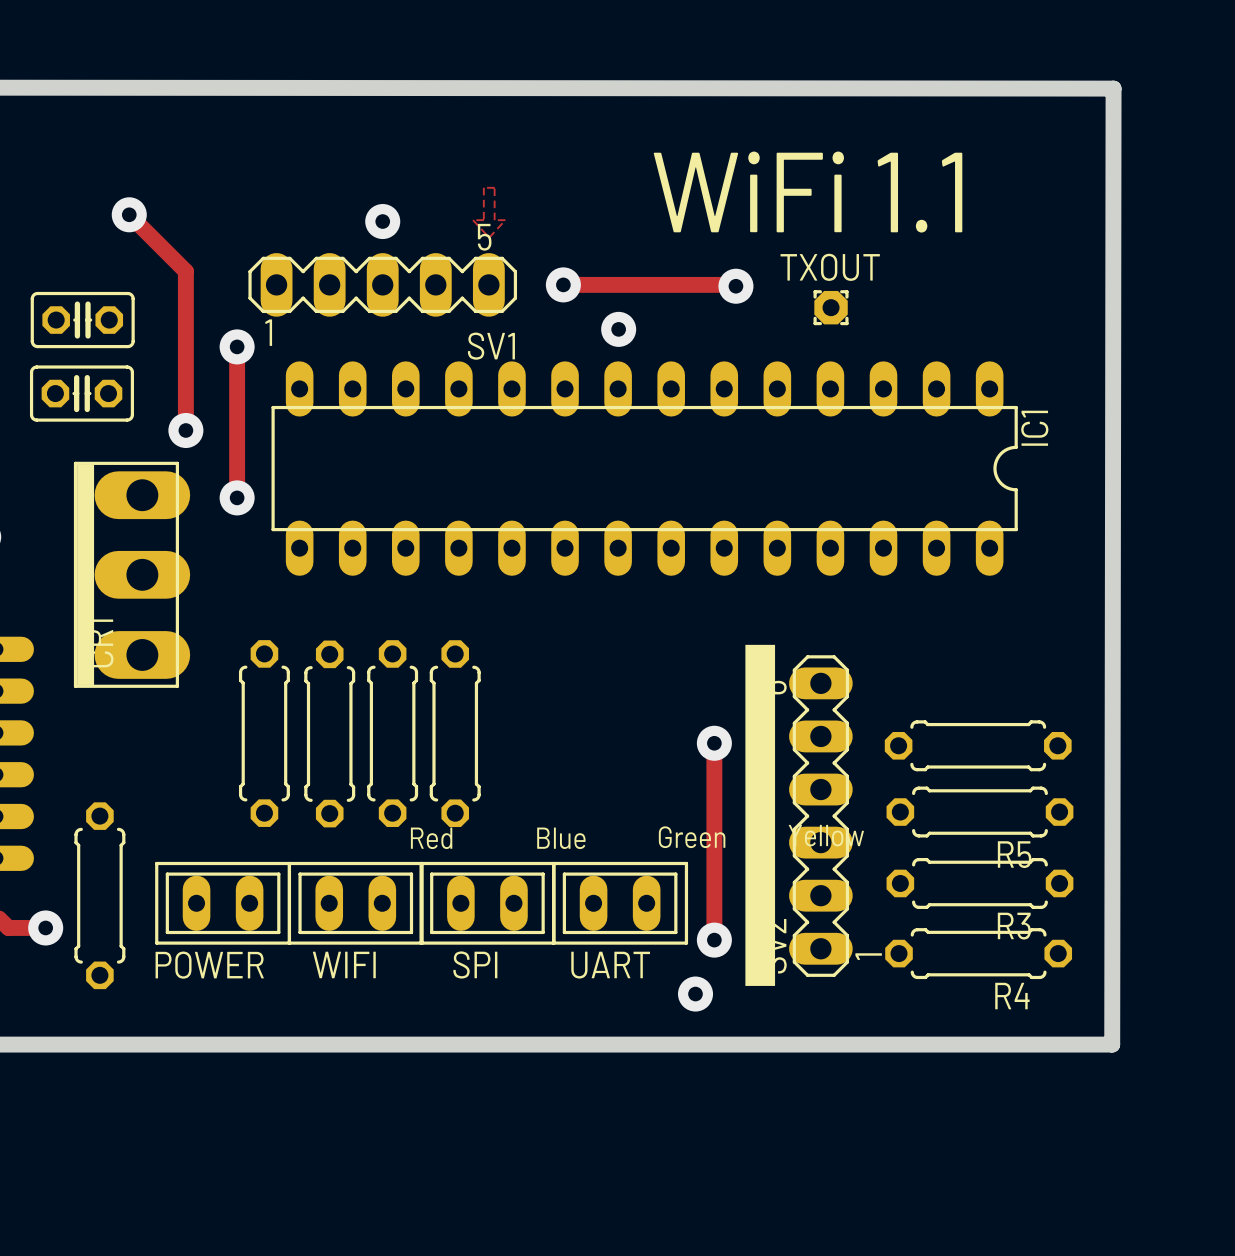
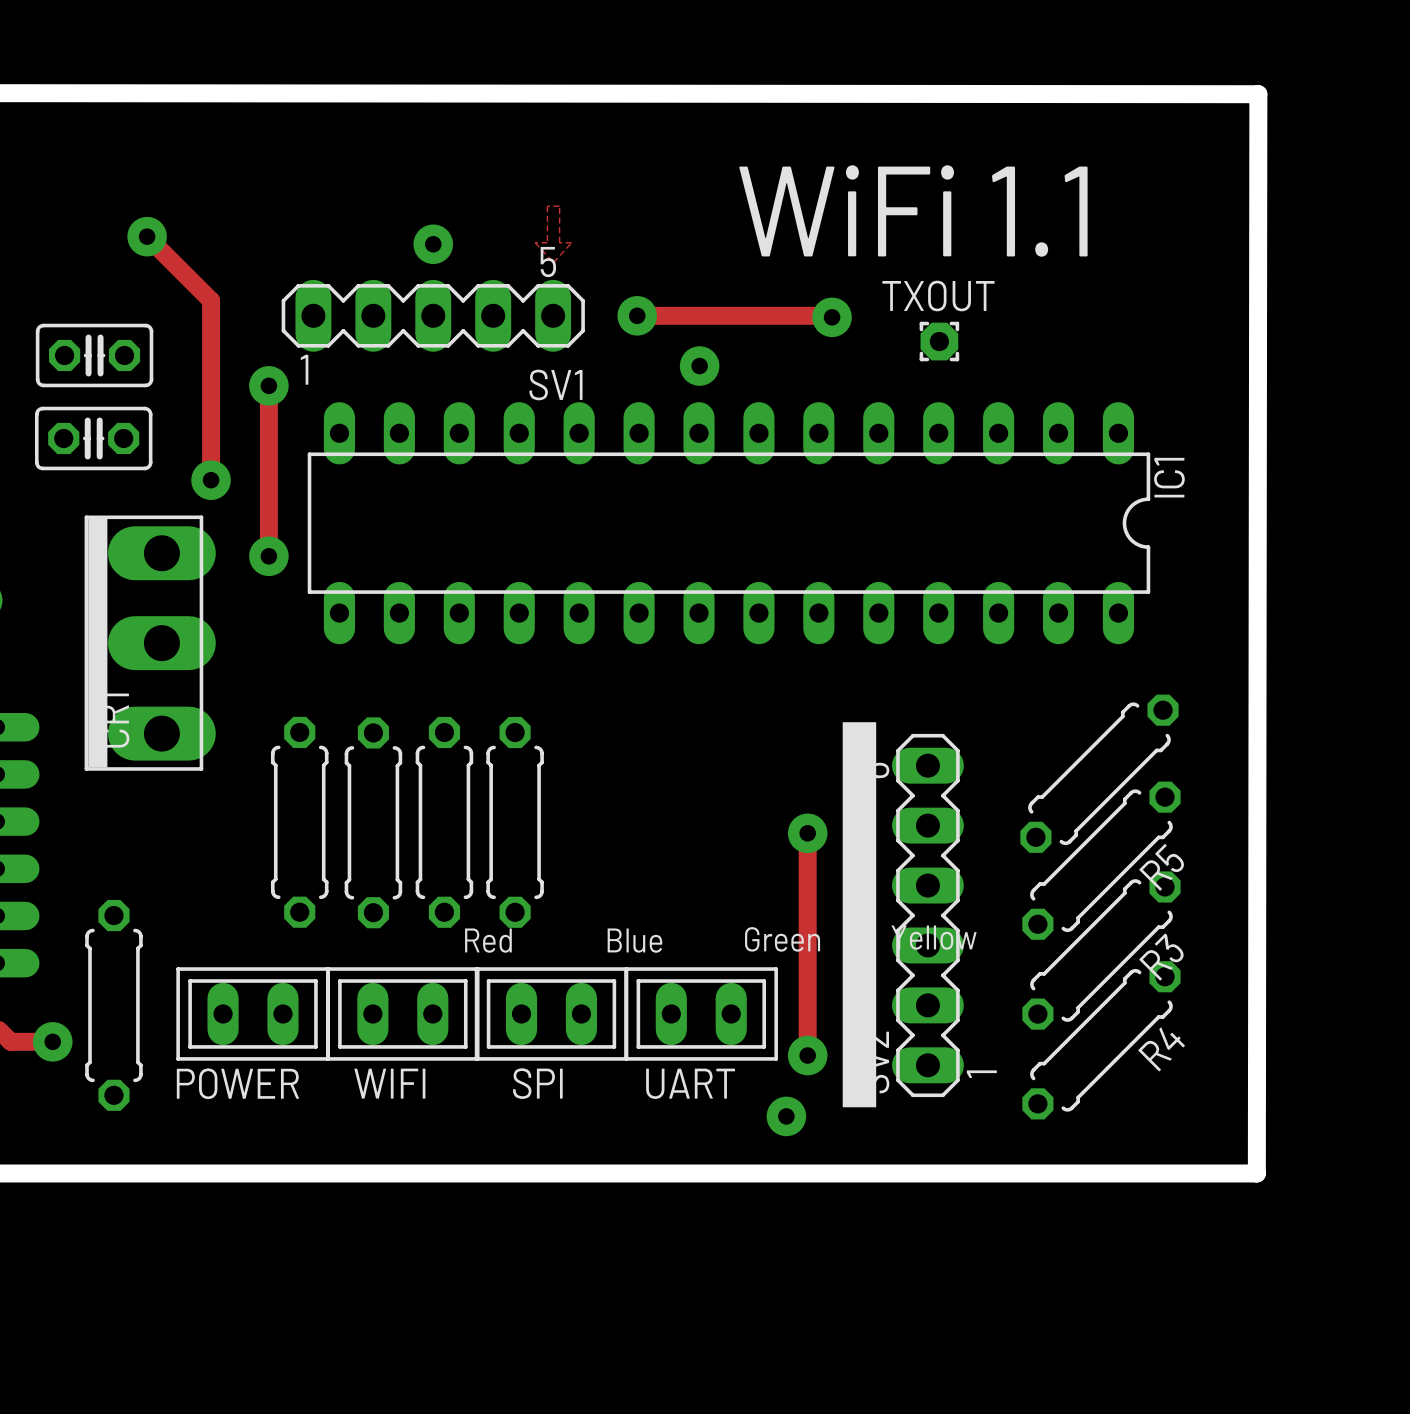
part: none -> (1099, 773)
part: (978, 745) -> none
R5 rotation: 0° (979, 812) -> 45° counterclockwise (1101, 860)
R3 rotation: 0° (979, 883) -> 45° counterclockwise (1101, 950)
R4 rotation: 0° (978, 953) -> 45° counterclockwise (1101, 1040)

